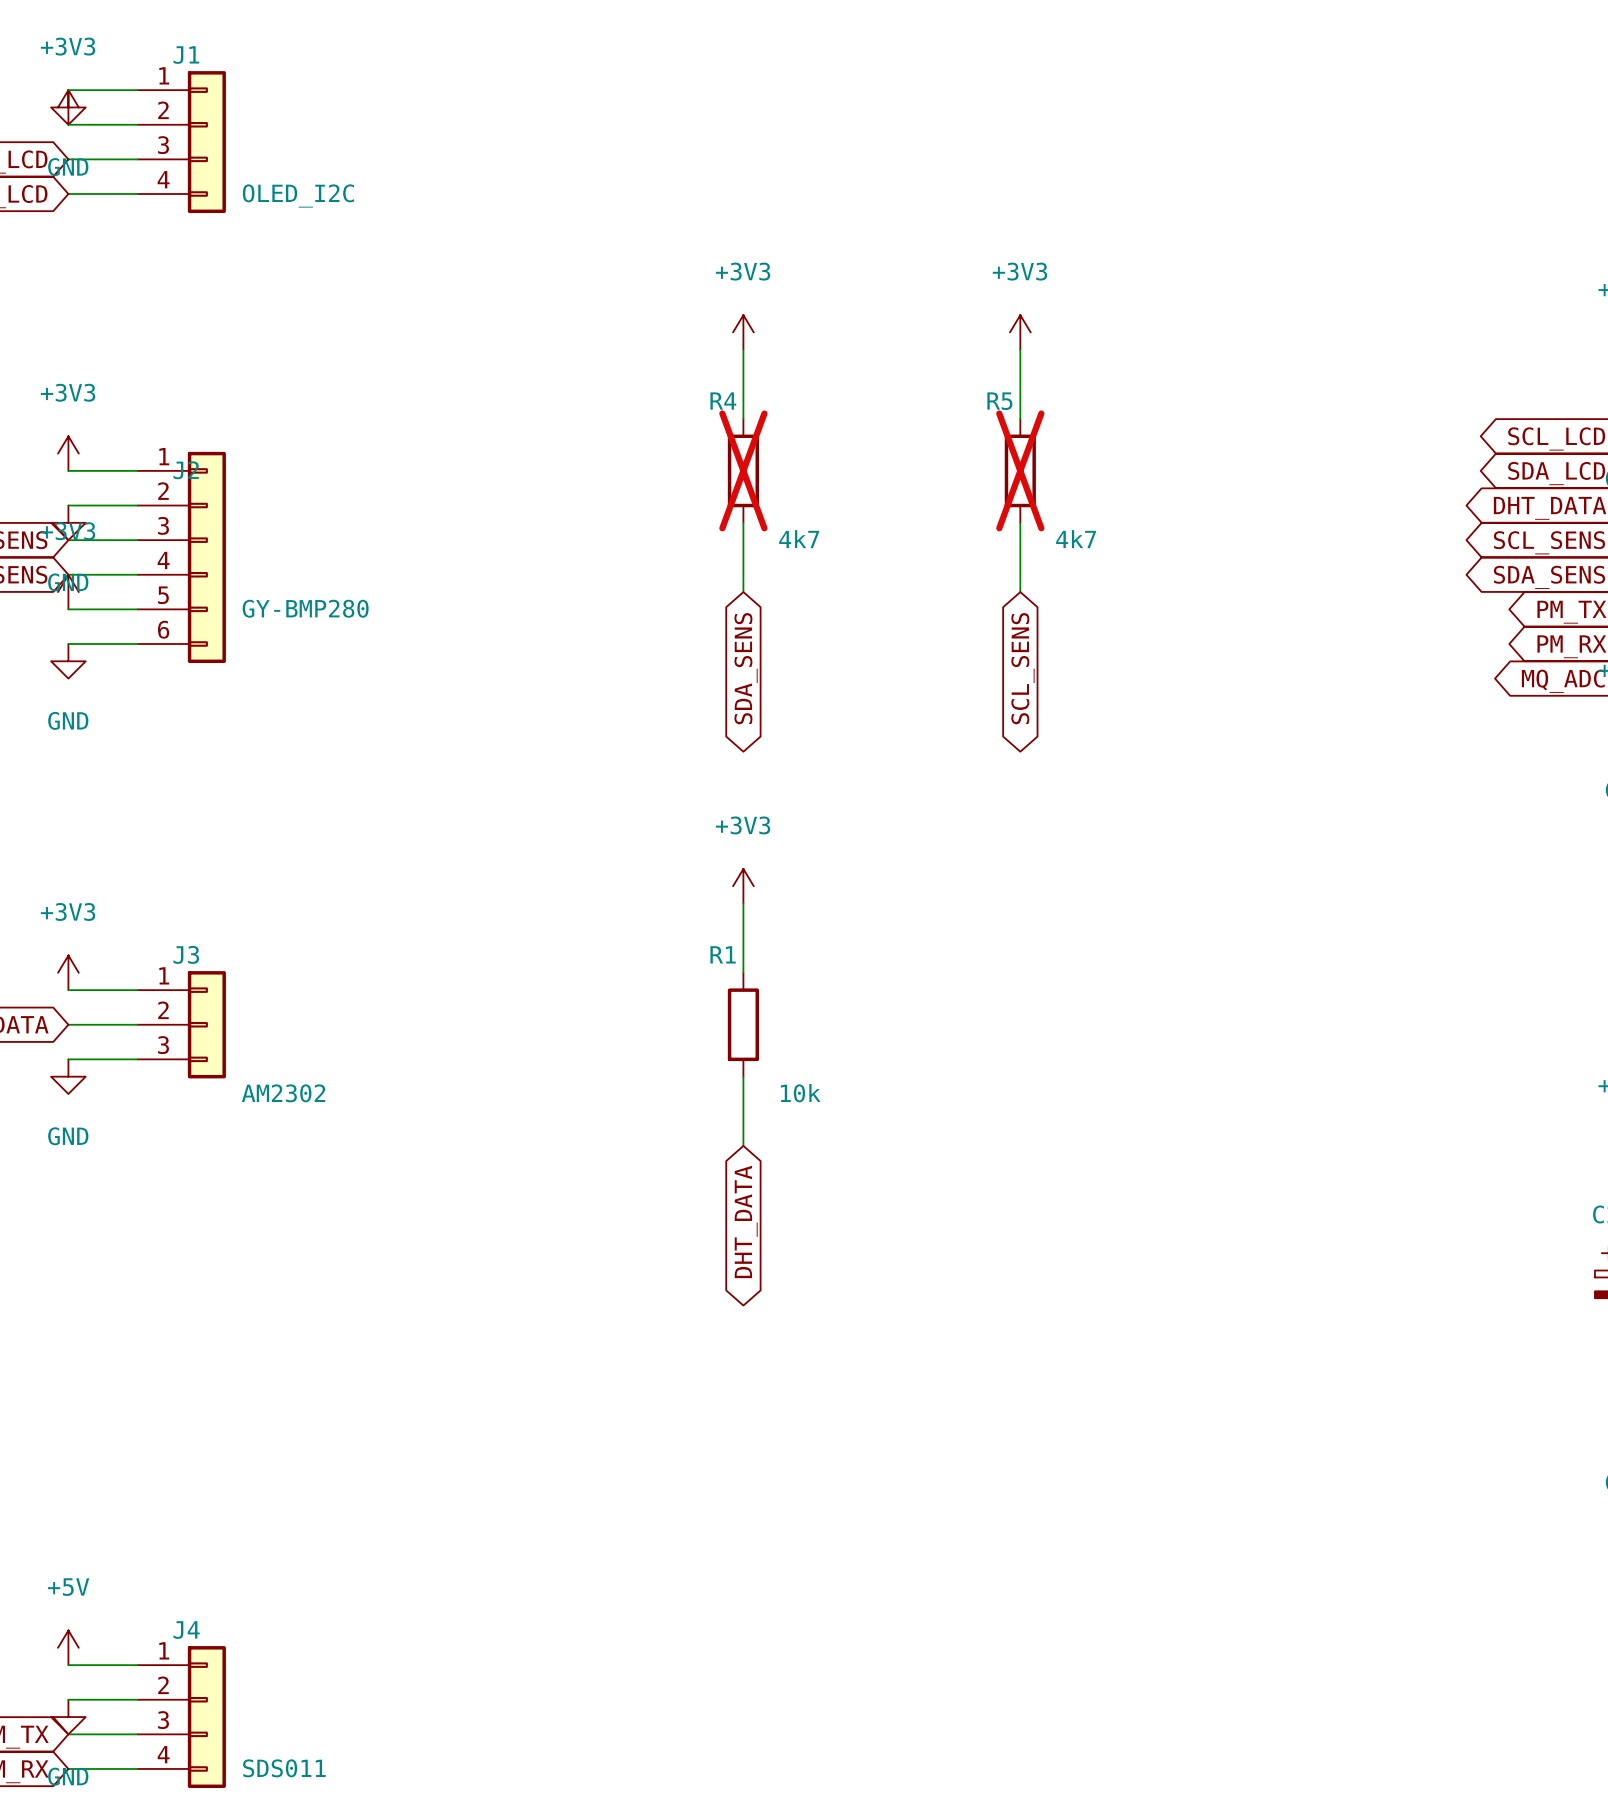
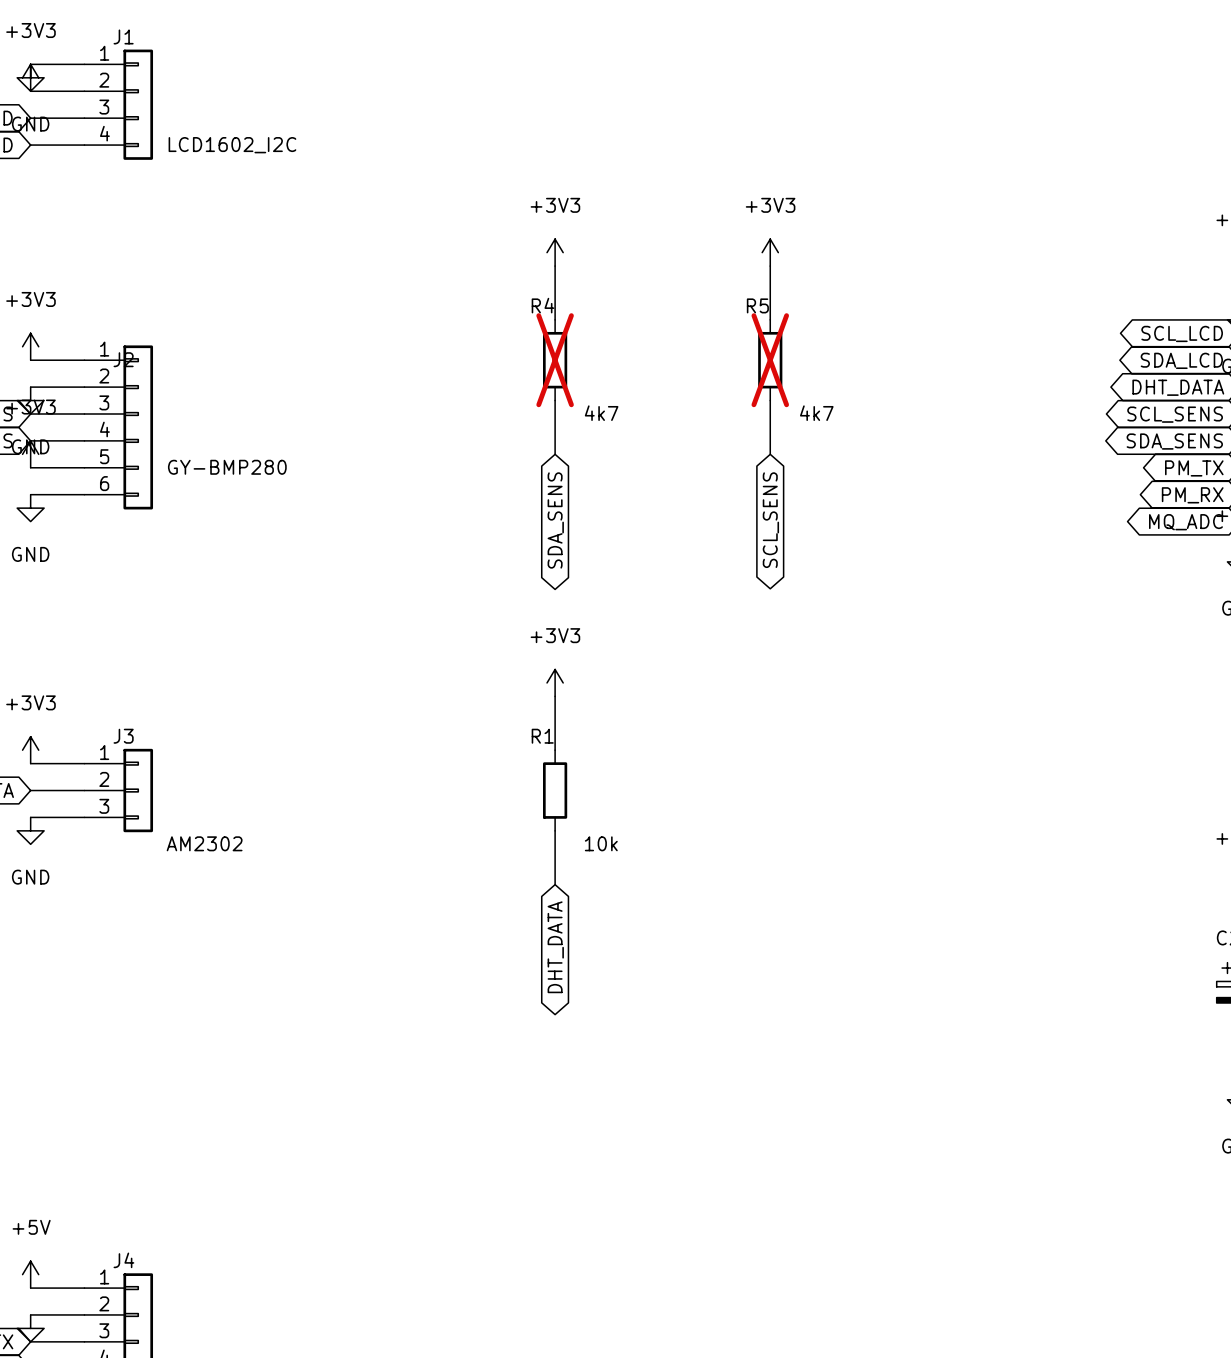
J1 value: OLED_I2C (298, 195) -> LCD1602_I2C (232, 145)

